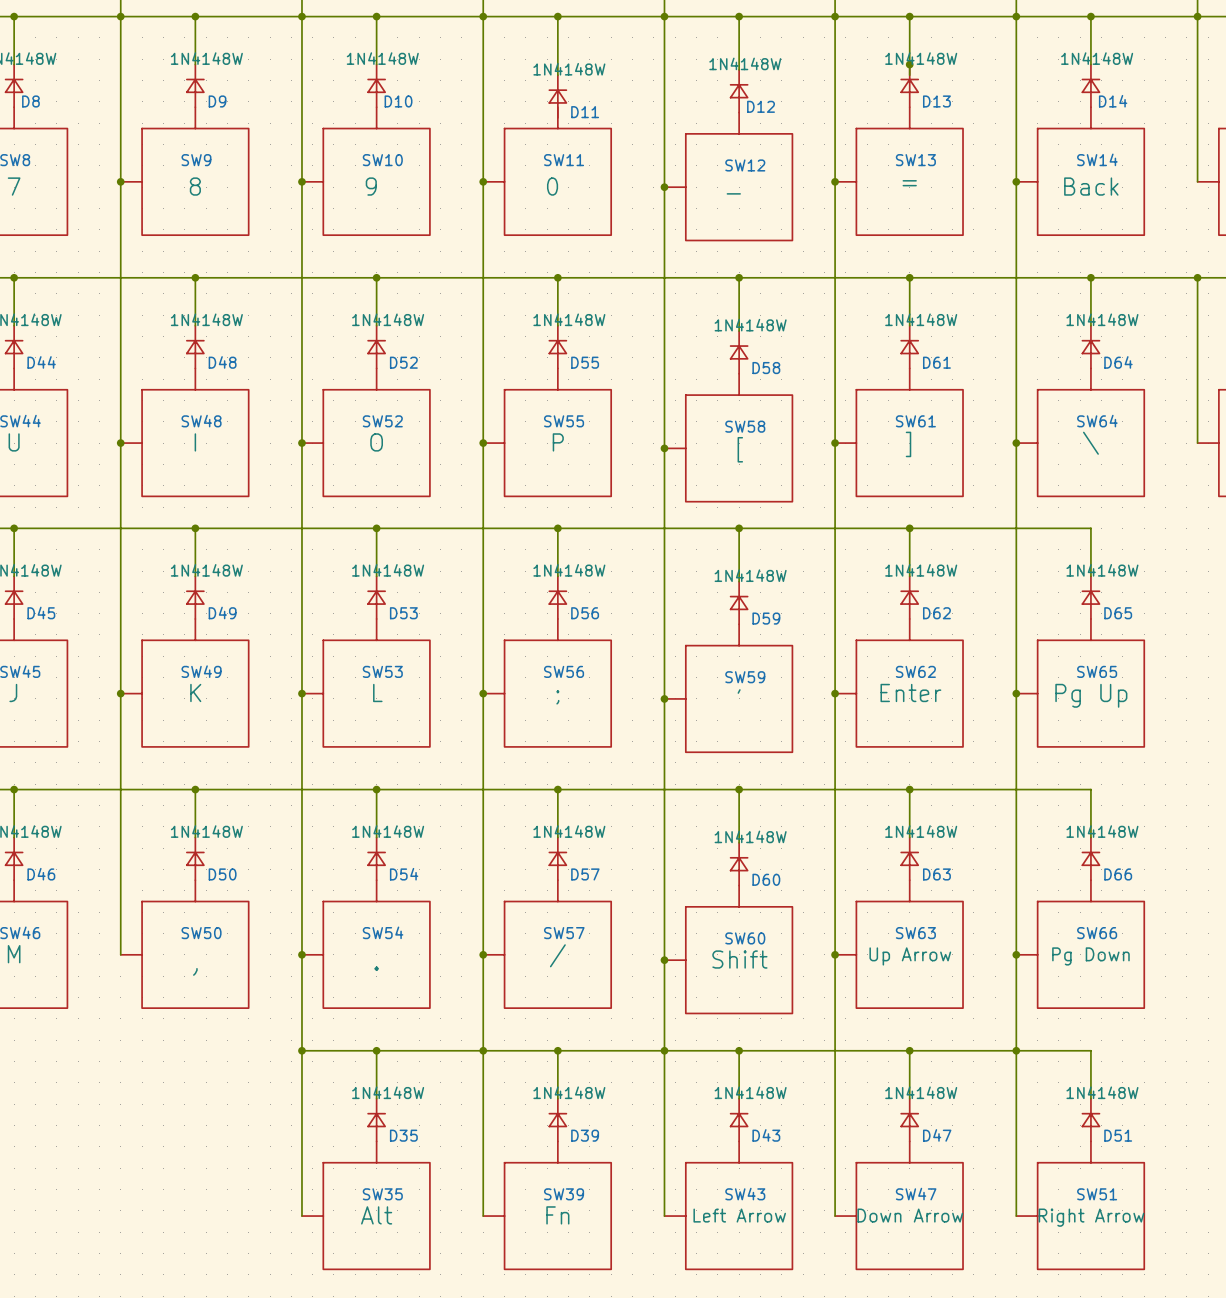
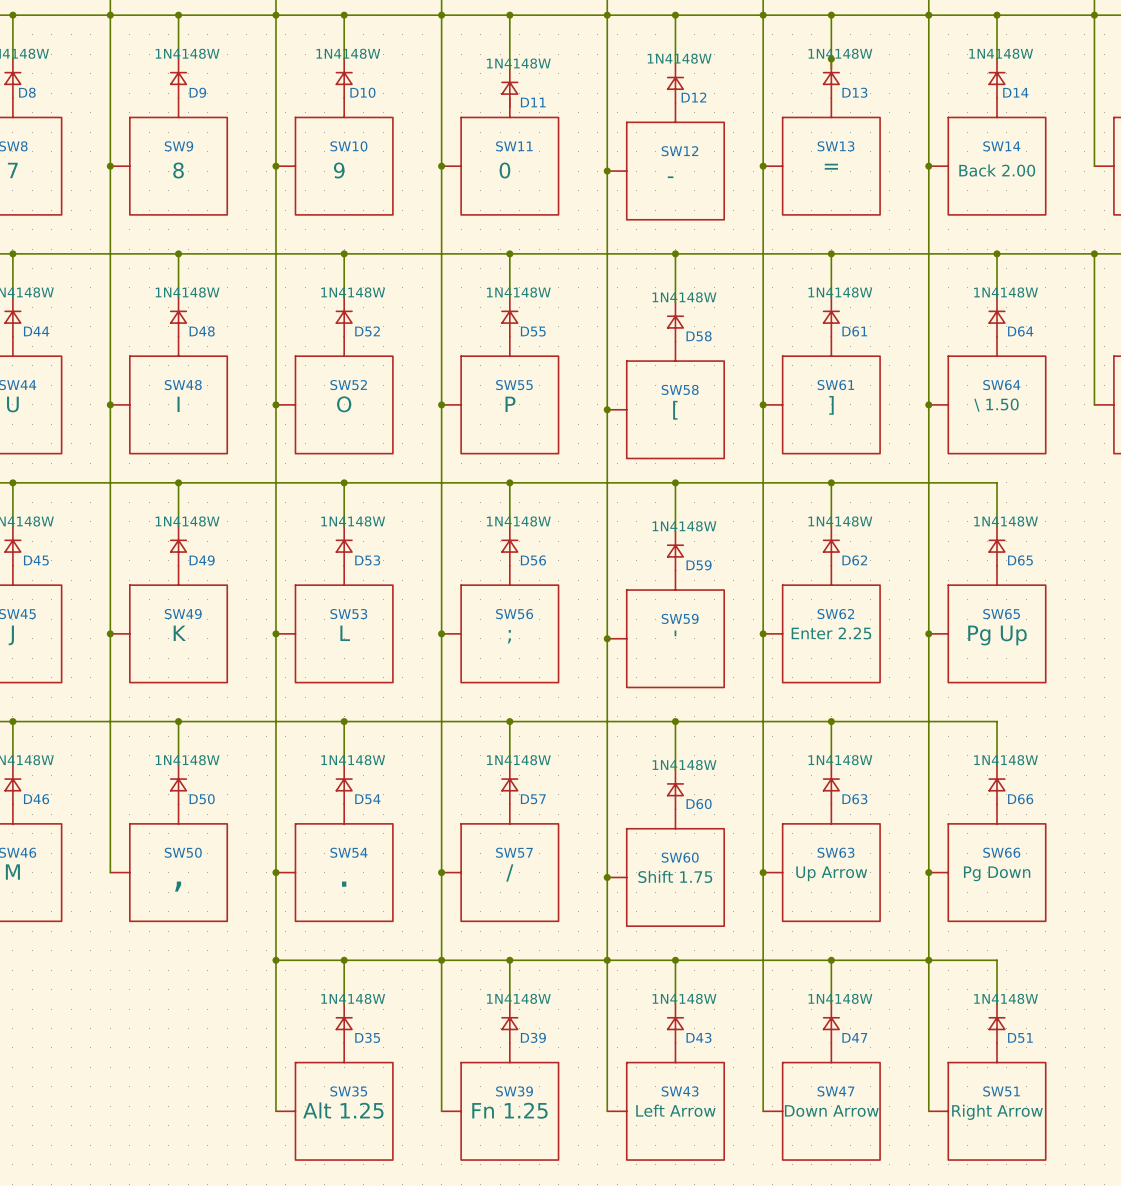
SW14 value: Back (1091, 186) -> Back 2.00 (997, 170)
SW64 value: \ (1090, 443) -> \ 1.50 (996, 405)
SW62 value: Enter (910, 692) -> Enter 2.25 (831, 633)
SW60 value: Shift (739, 959) -> Shift 1.75 (675, 876)
SW35 value: Alt (376, 1215) -> Alt 1.25 (343, 1110)
SW39 value: Fn (557, 1215) -> Fn 1.25 (509, 1110)

